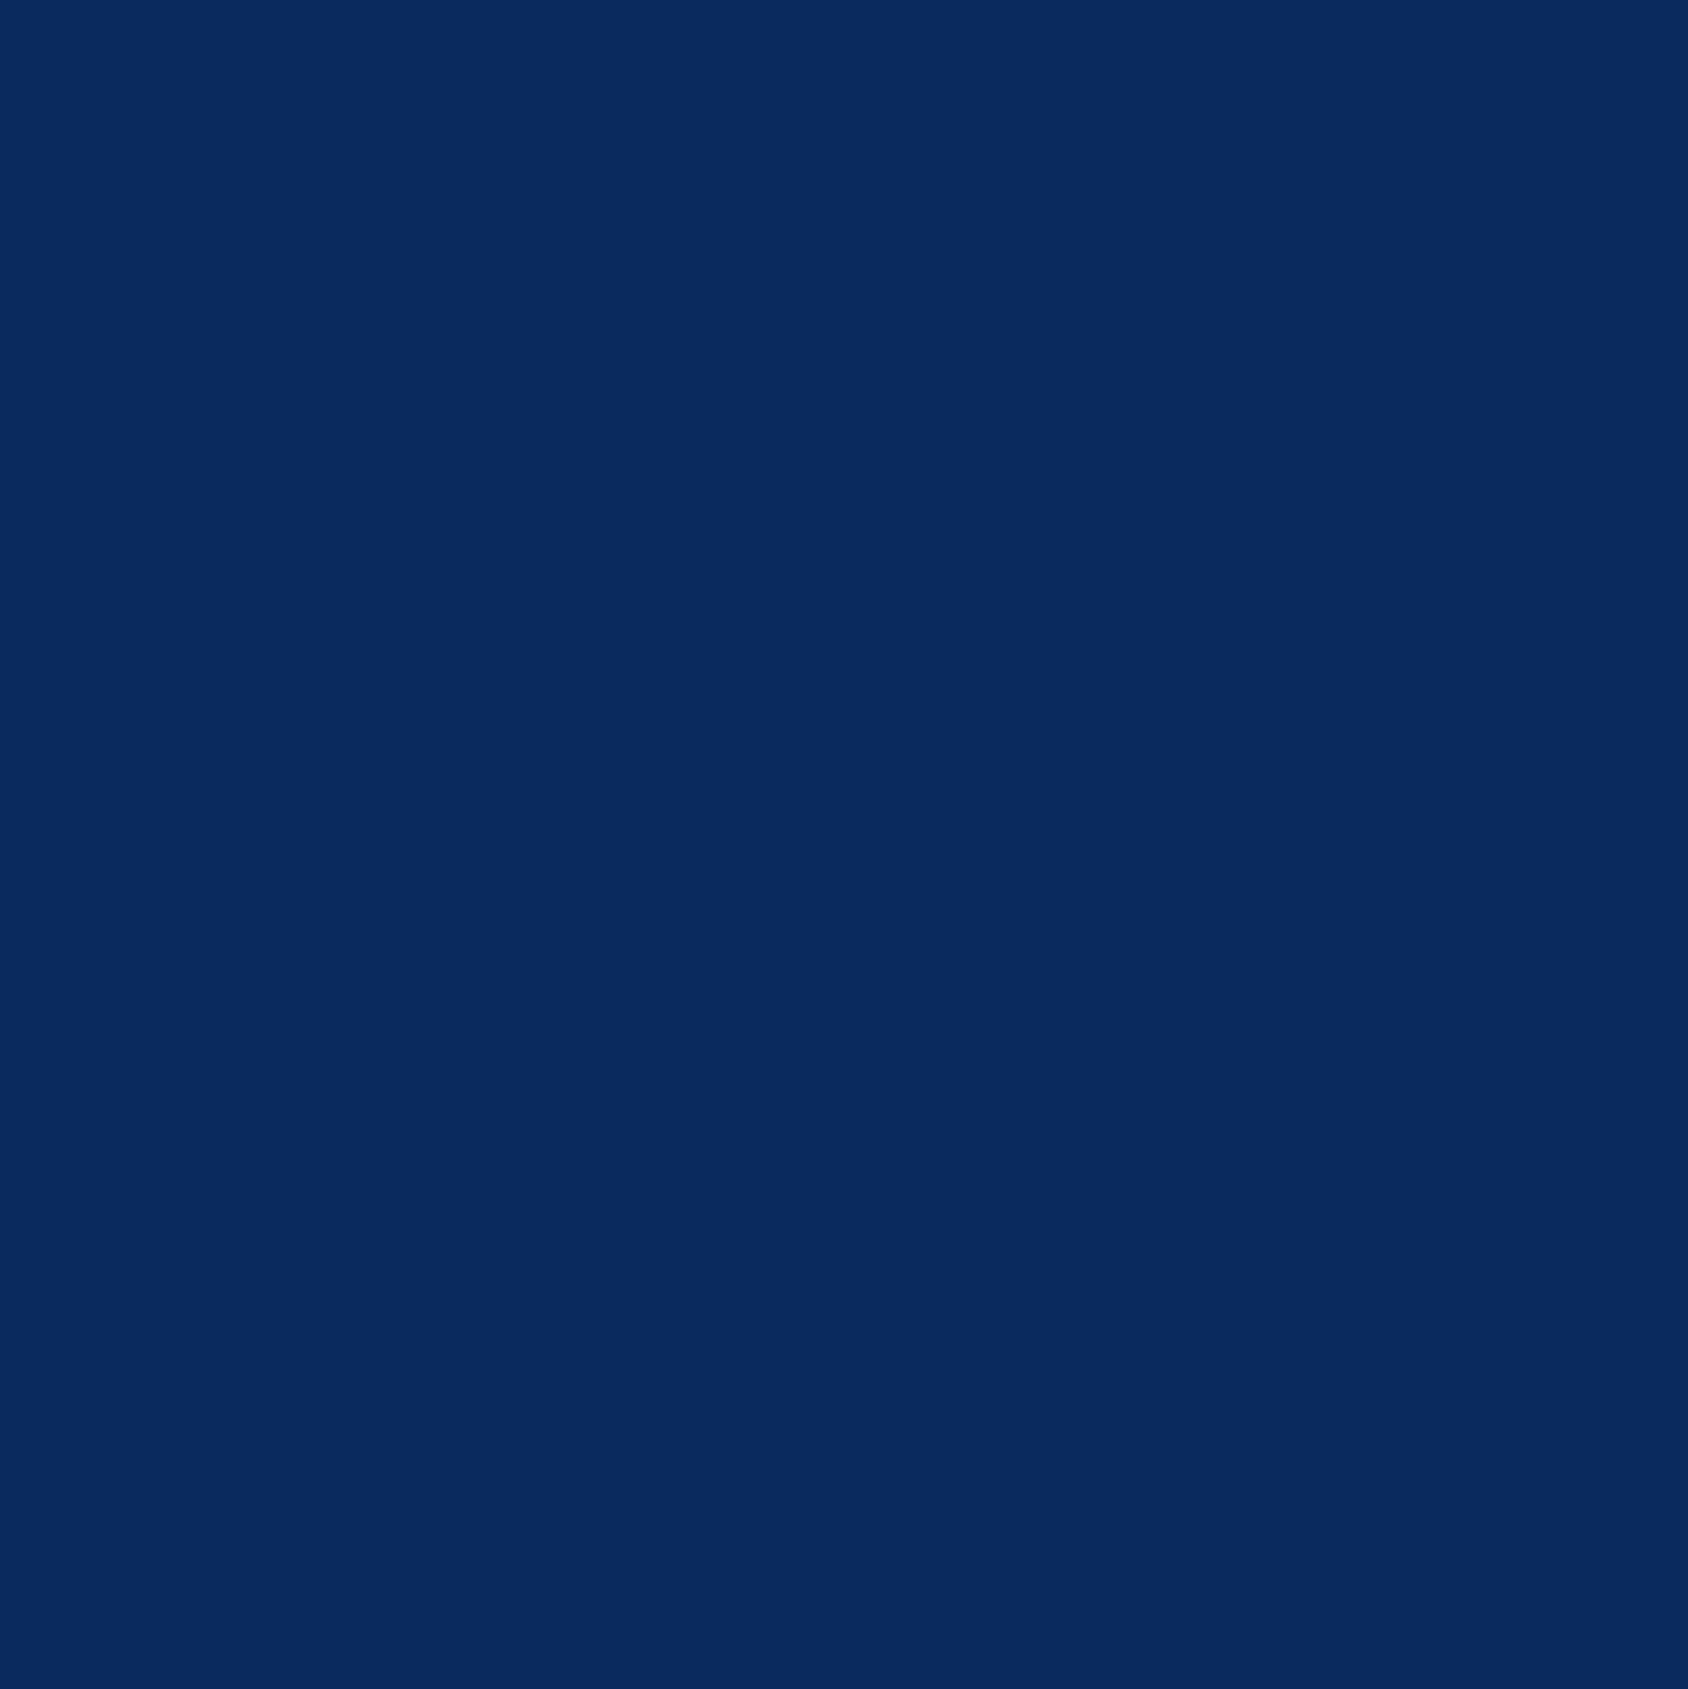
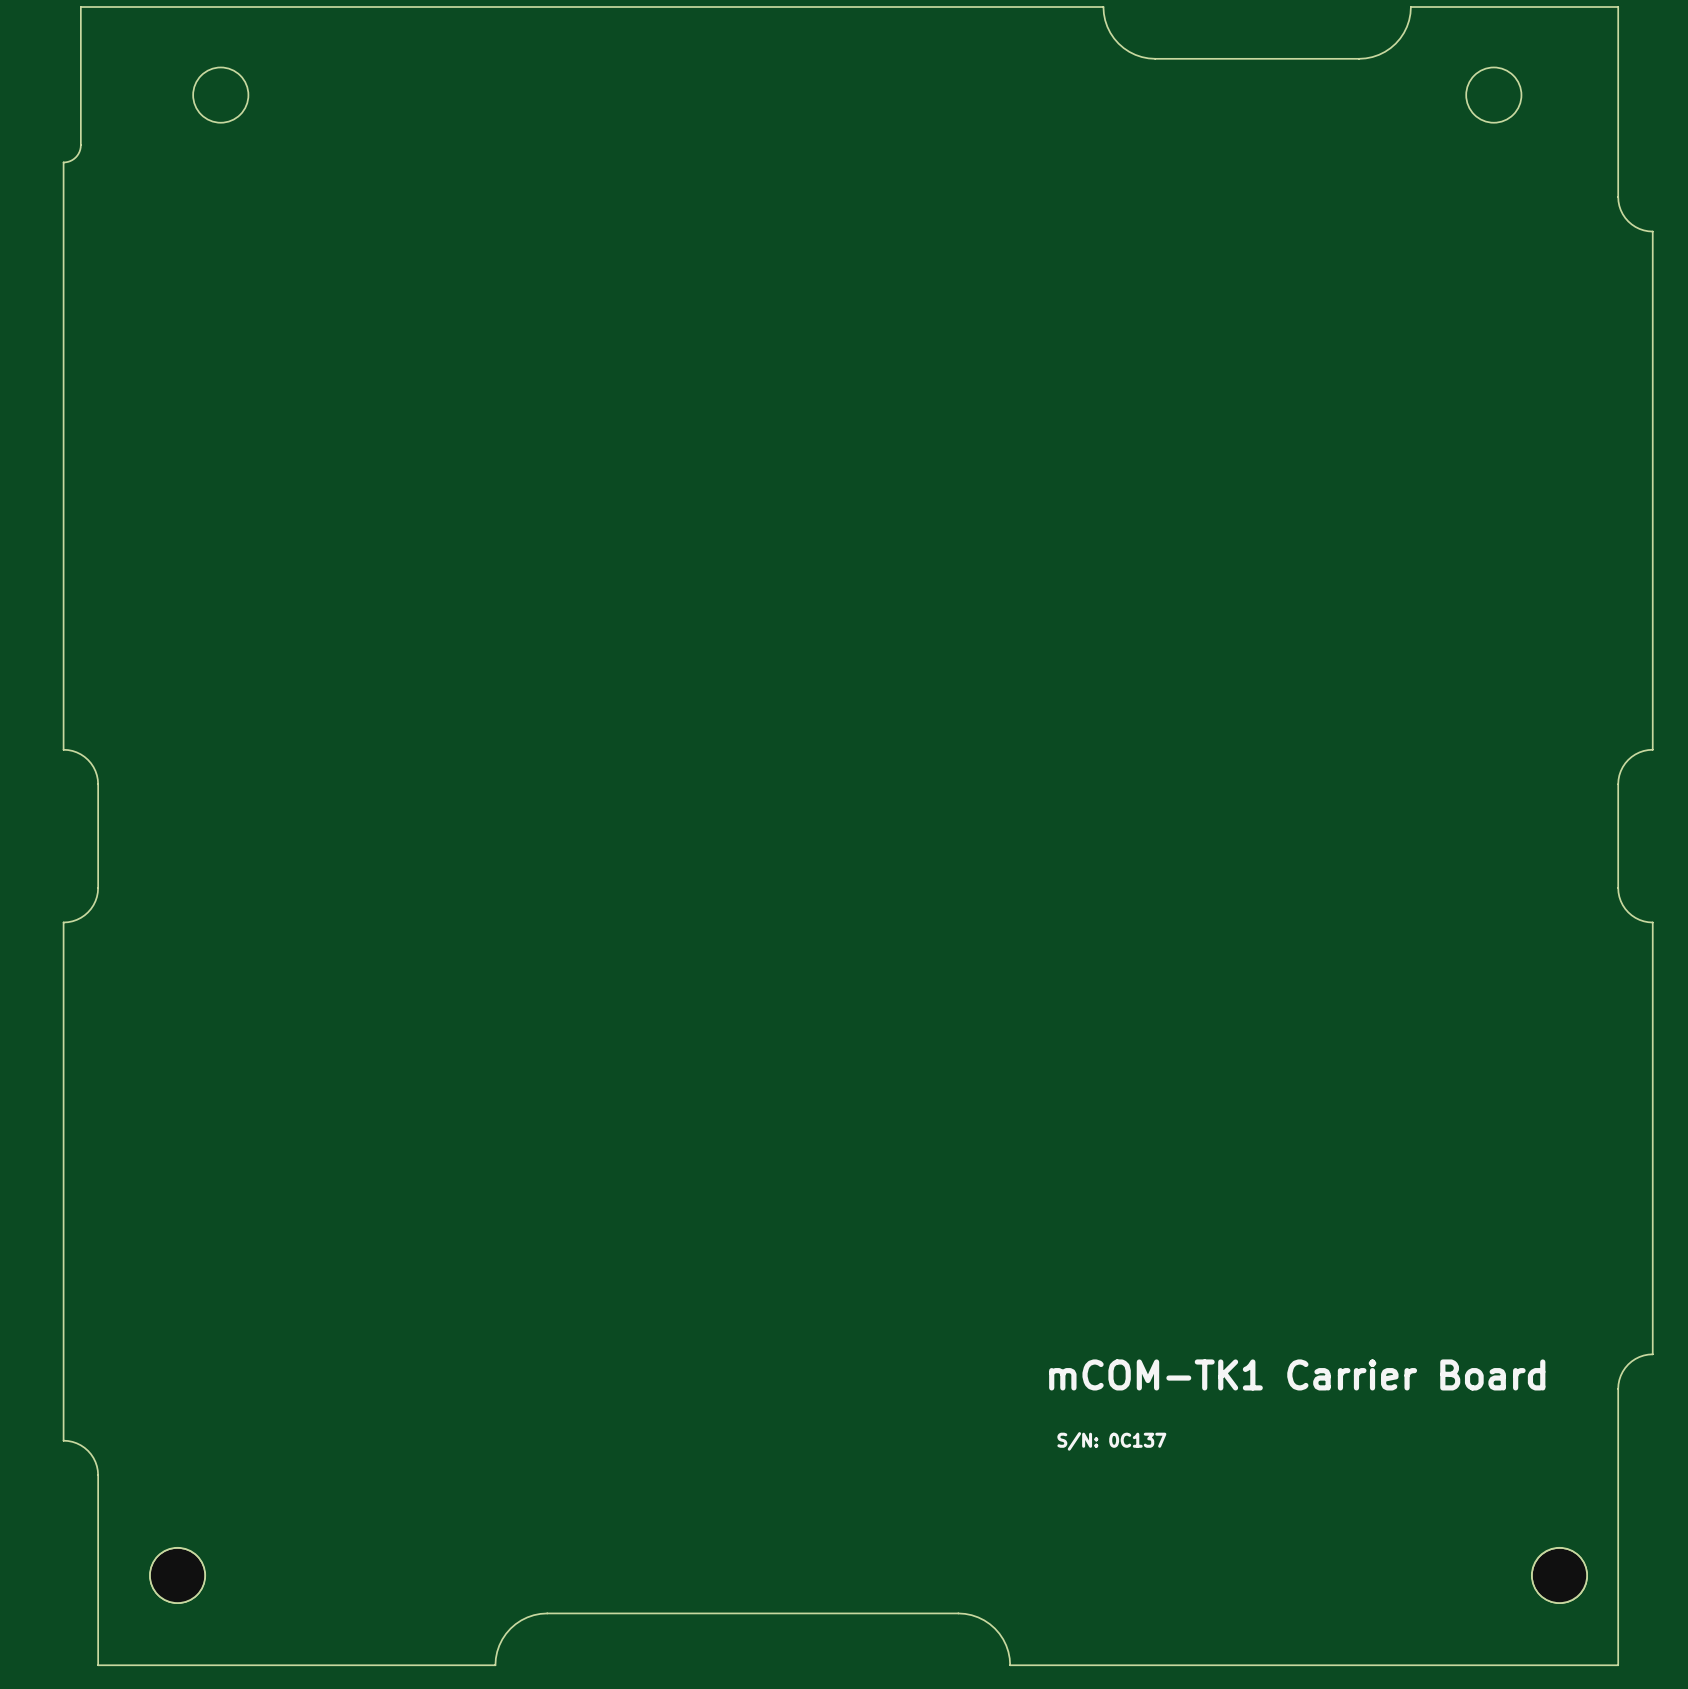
drawing: none -> [62, 6, 1654, 1667]
text: none -> mCOM-TK1 Carrier Board (1297, 1374)
text: none -> S/N: 0C137 (1111, 1441)
part: none -> (177, 1575)
part: none -> (1559, 1575)

